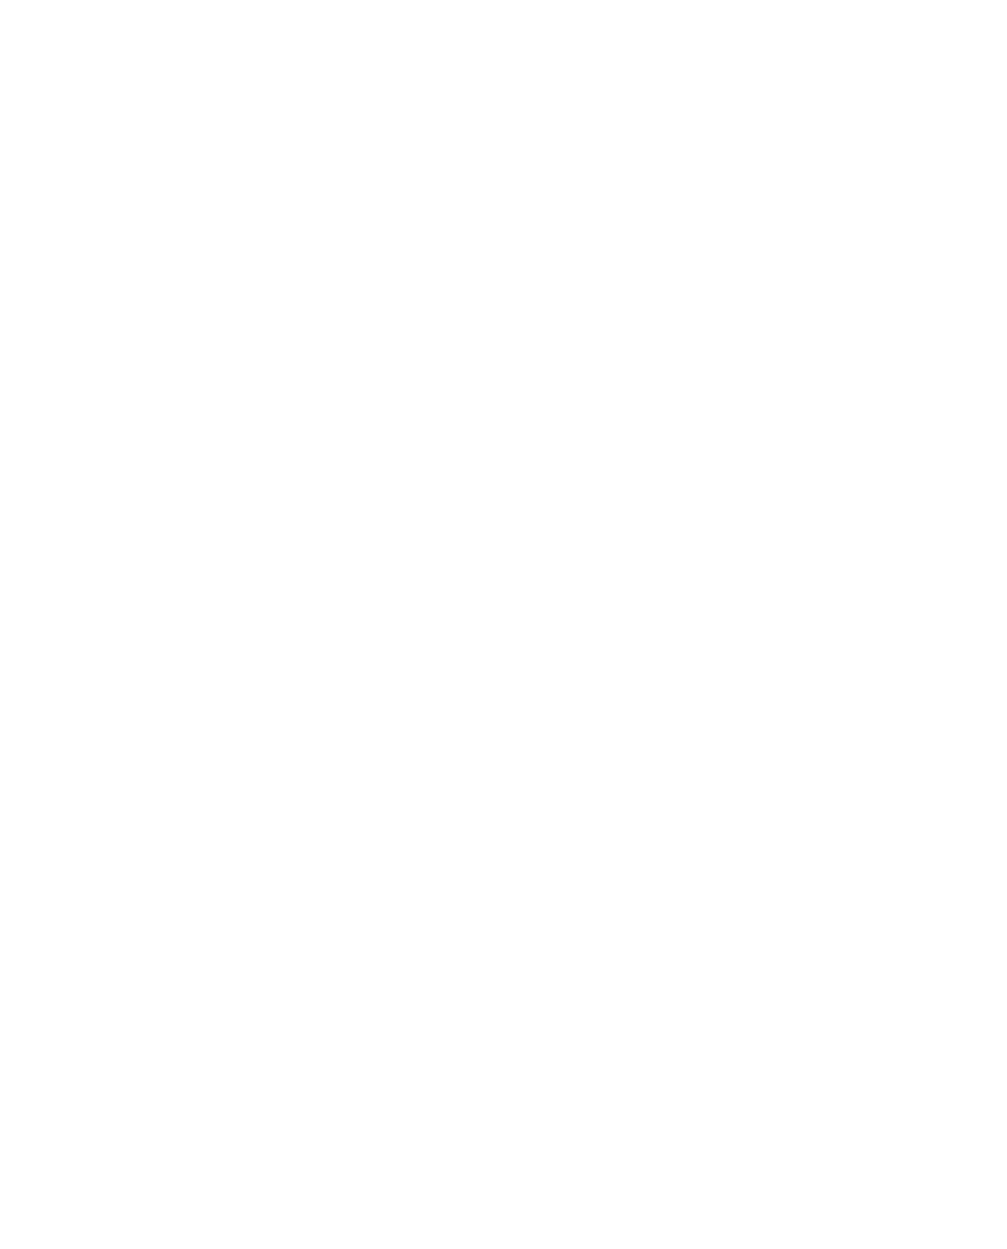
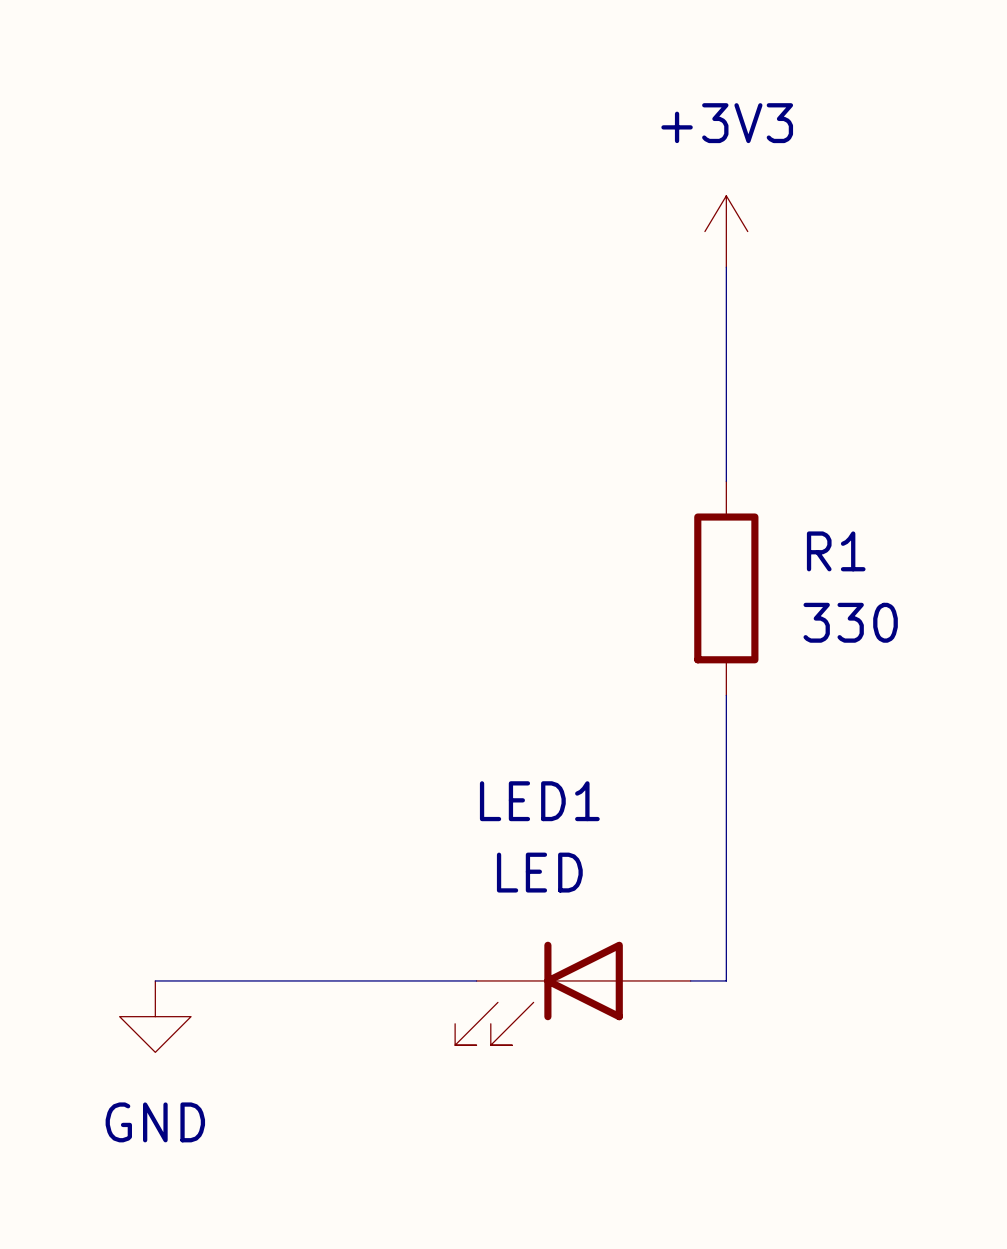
power symbol: none -> +3V3 (726, 231)
wire: none -> (726, 267) (726, 481)
R1: none -> 330 (726, 588)
wire: none -> (726, 695) (726, 980) (690, 980)
wire: none -> (155, 980) (476, 980)
LED1: none -> LED (572, 993)
power symbol: none -> GND (155, 1016)

